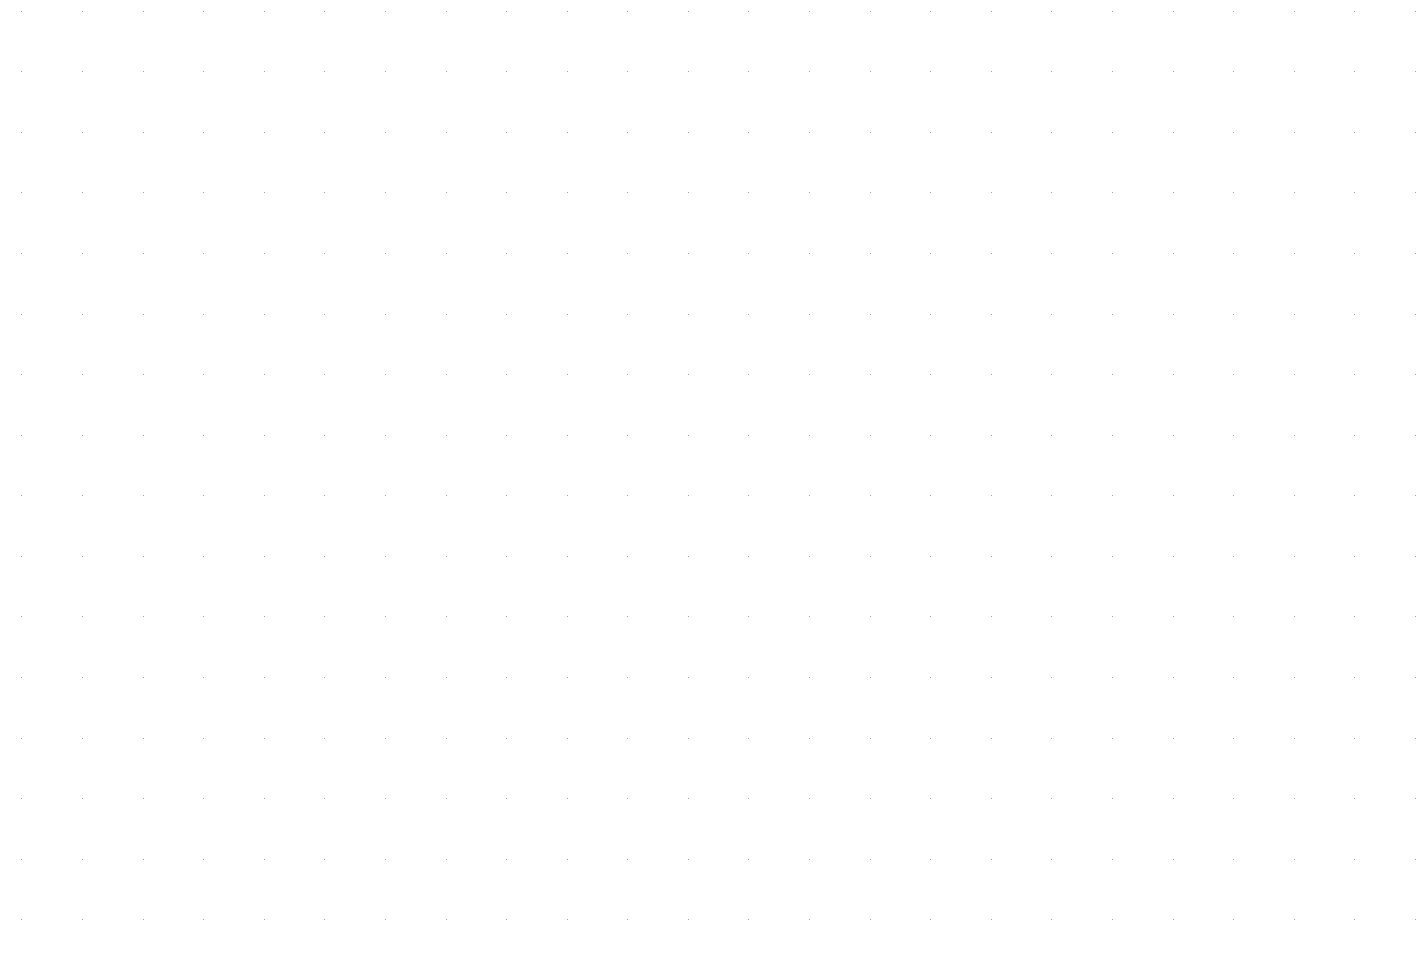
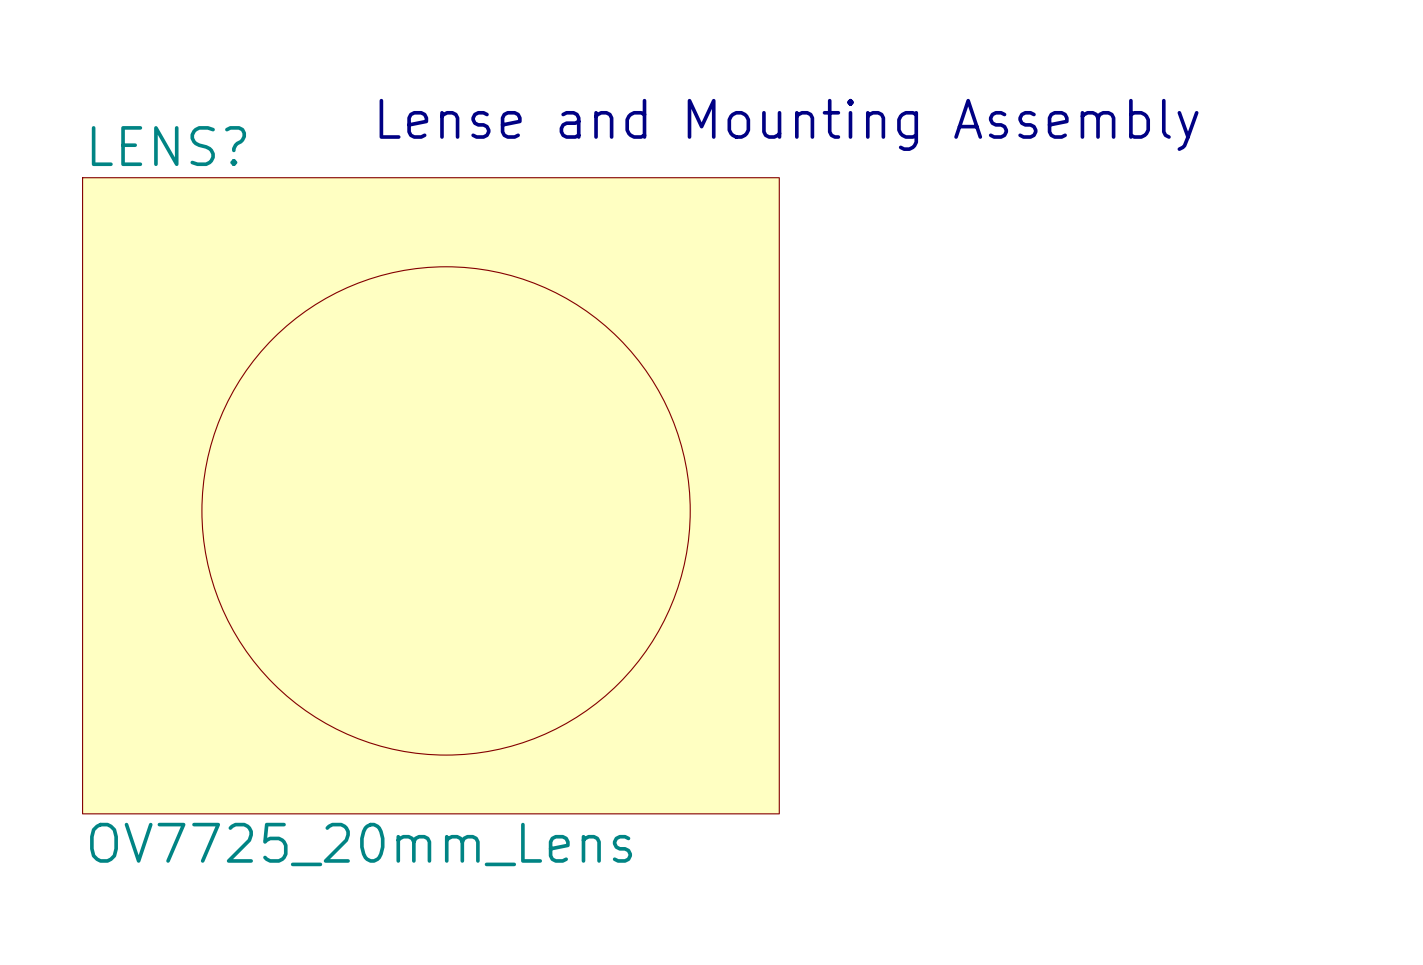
text: none -> Lense and Mounting Assembly (789, 124)
LENS?: none -> OV7725_20mm_Lens (430, 495)

